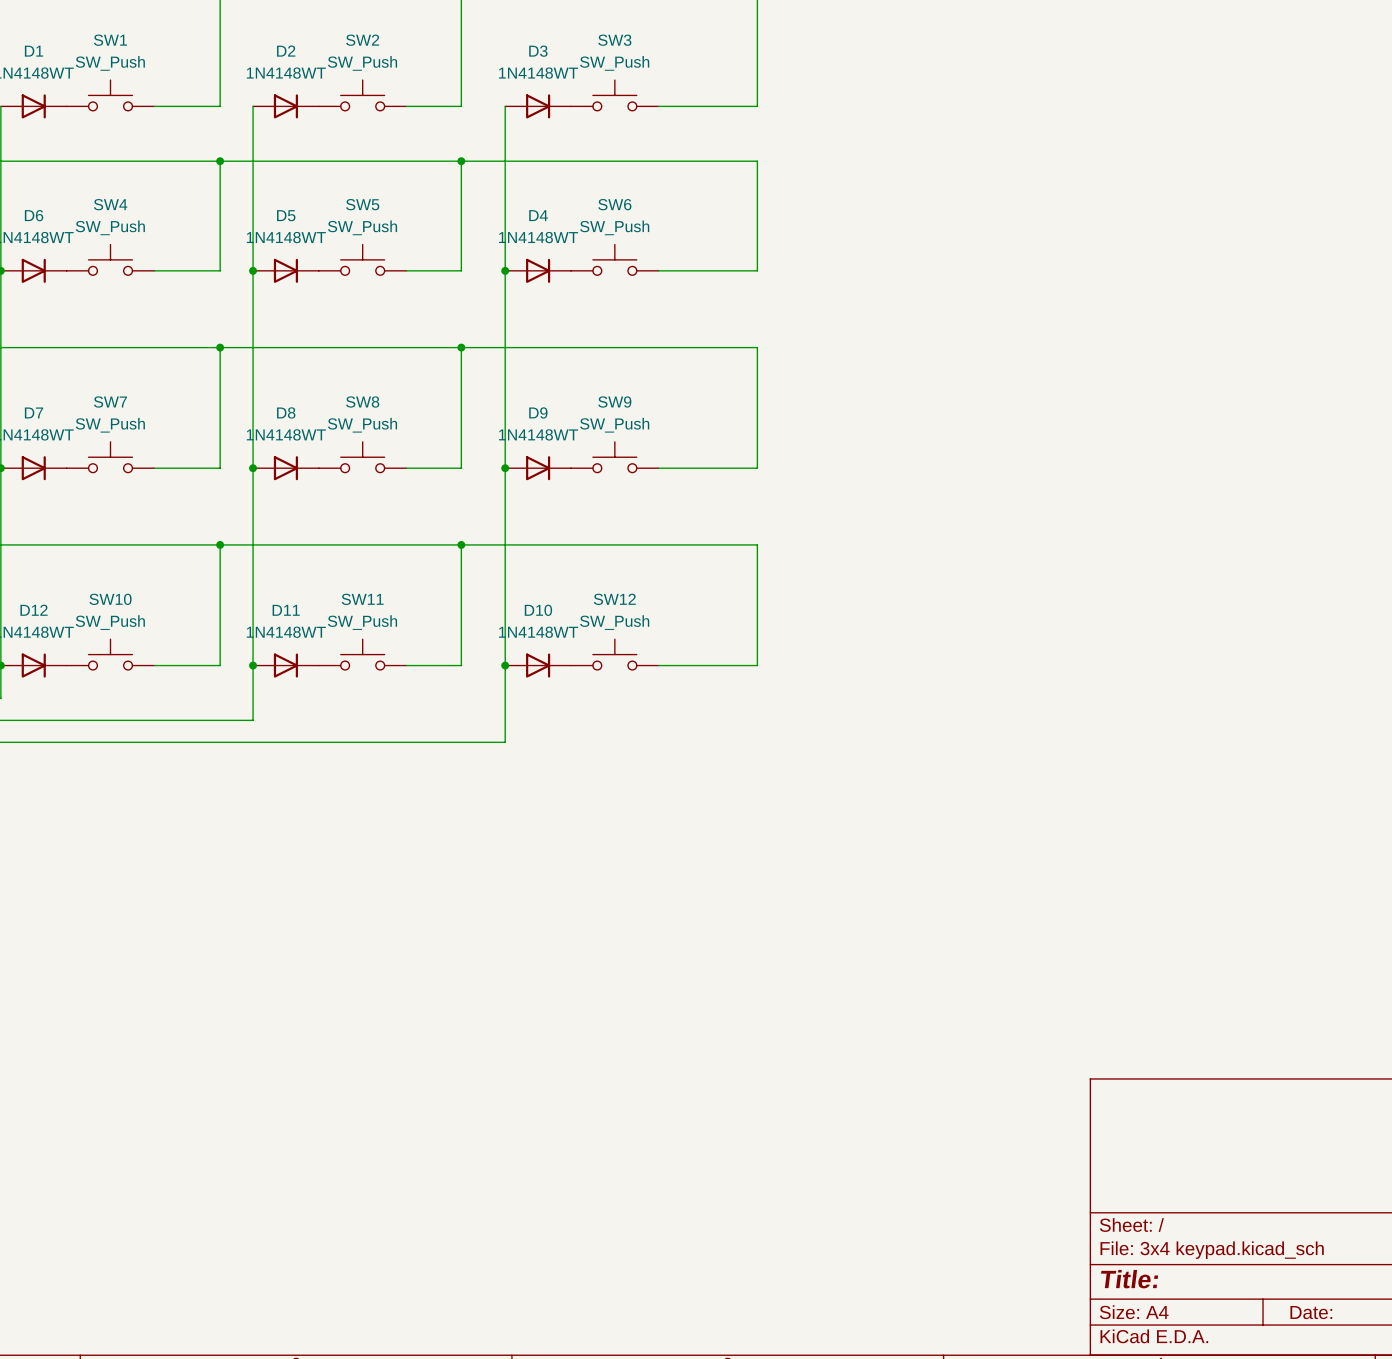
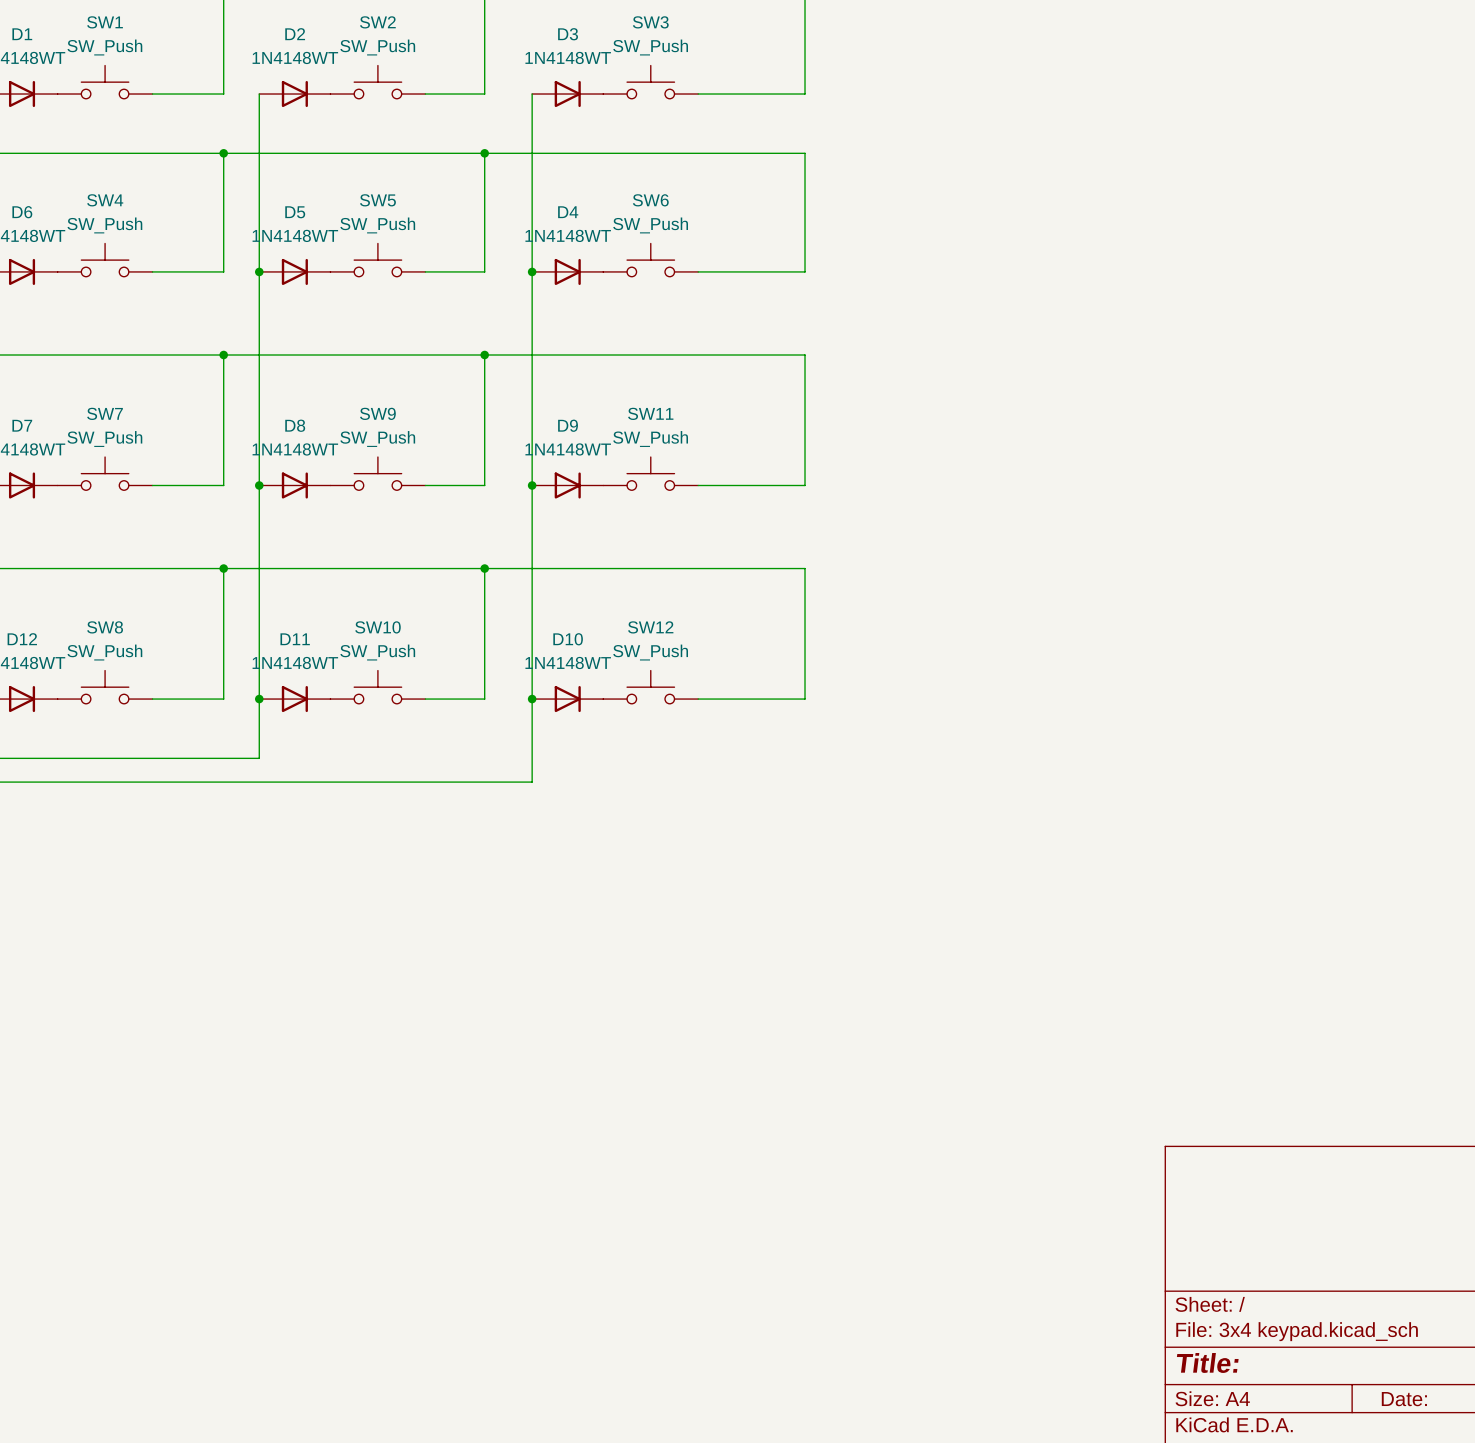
SW8 name: SW8 (362, 402) -> SW9 (377, 413)
SW9 name: SW9 (614, 402) -> SW11 (650, 413)
SW10 name: SW10 (110, 599) -> SW8 (105, 627)
SW11 name: SW11 (362, 599) -> SW10 (377, 627)

